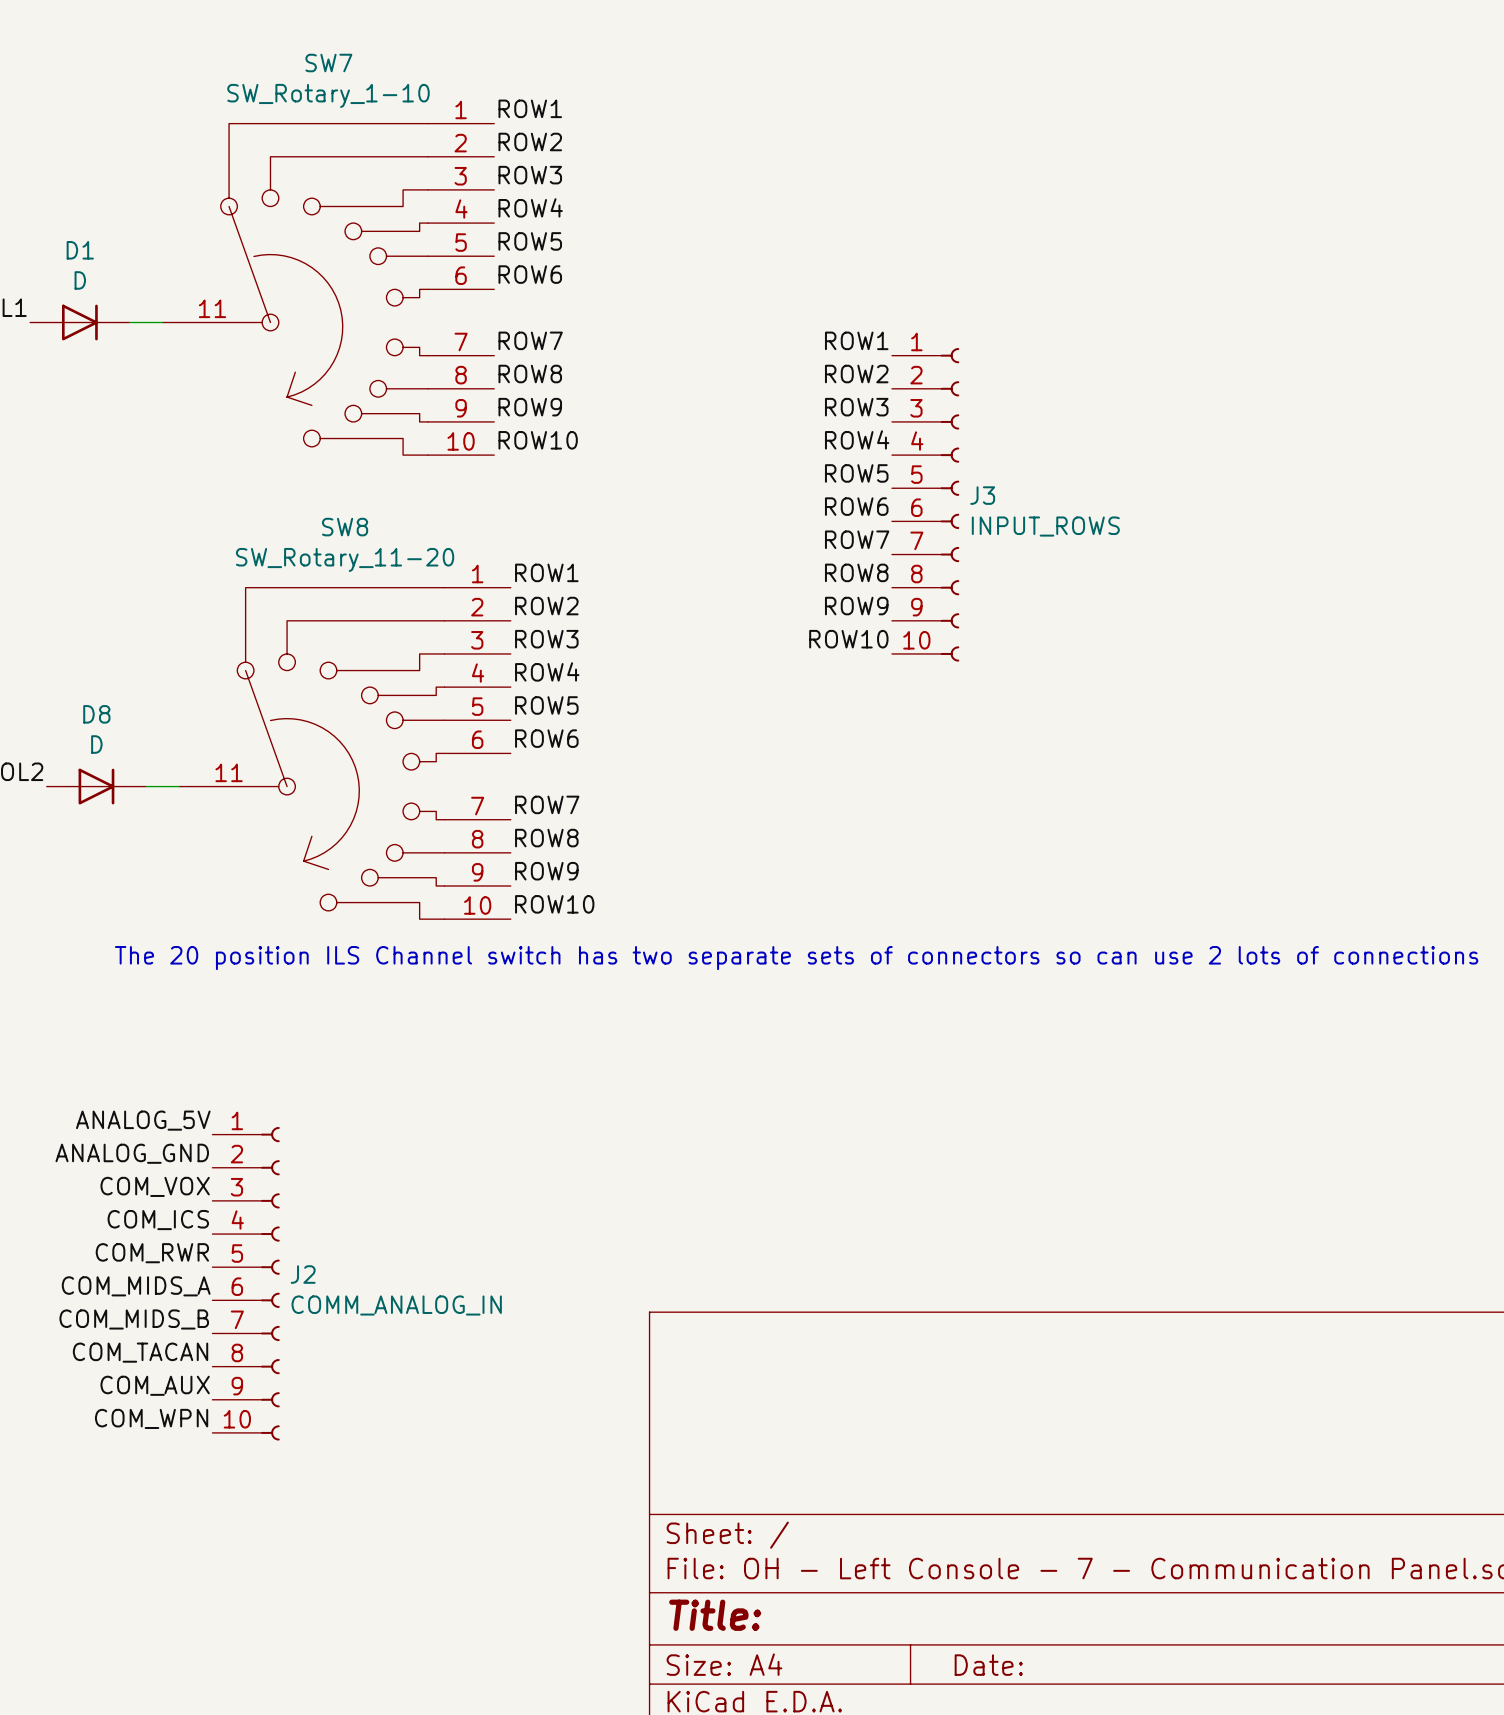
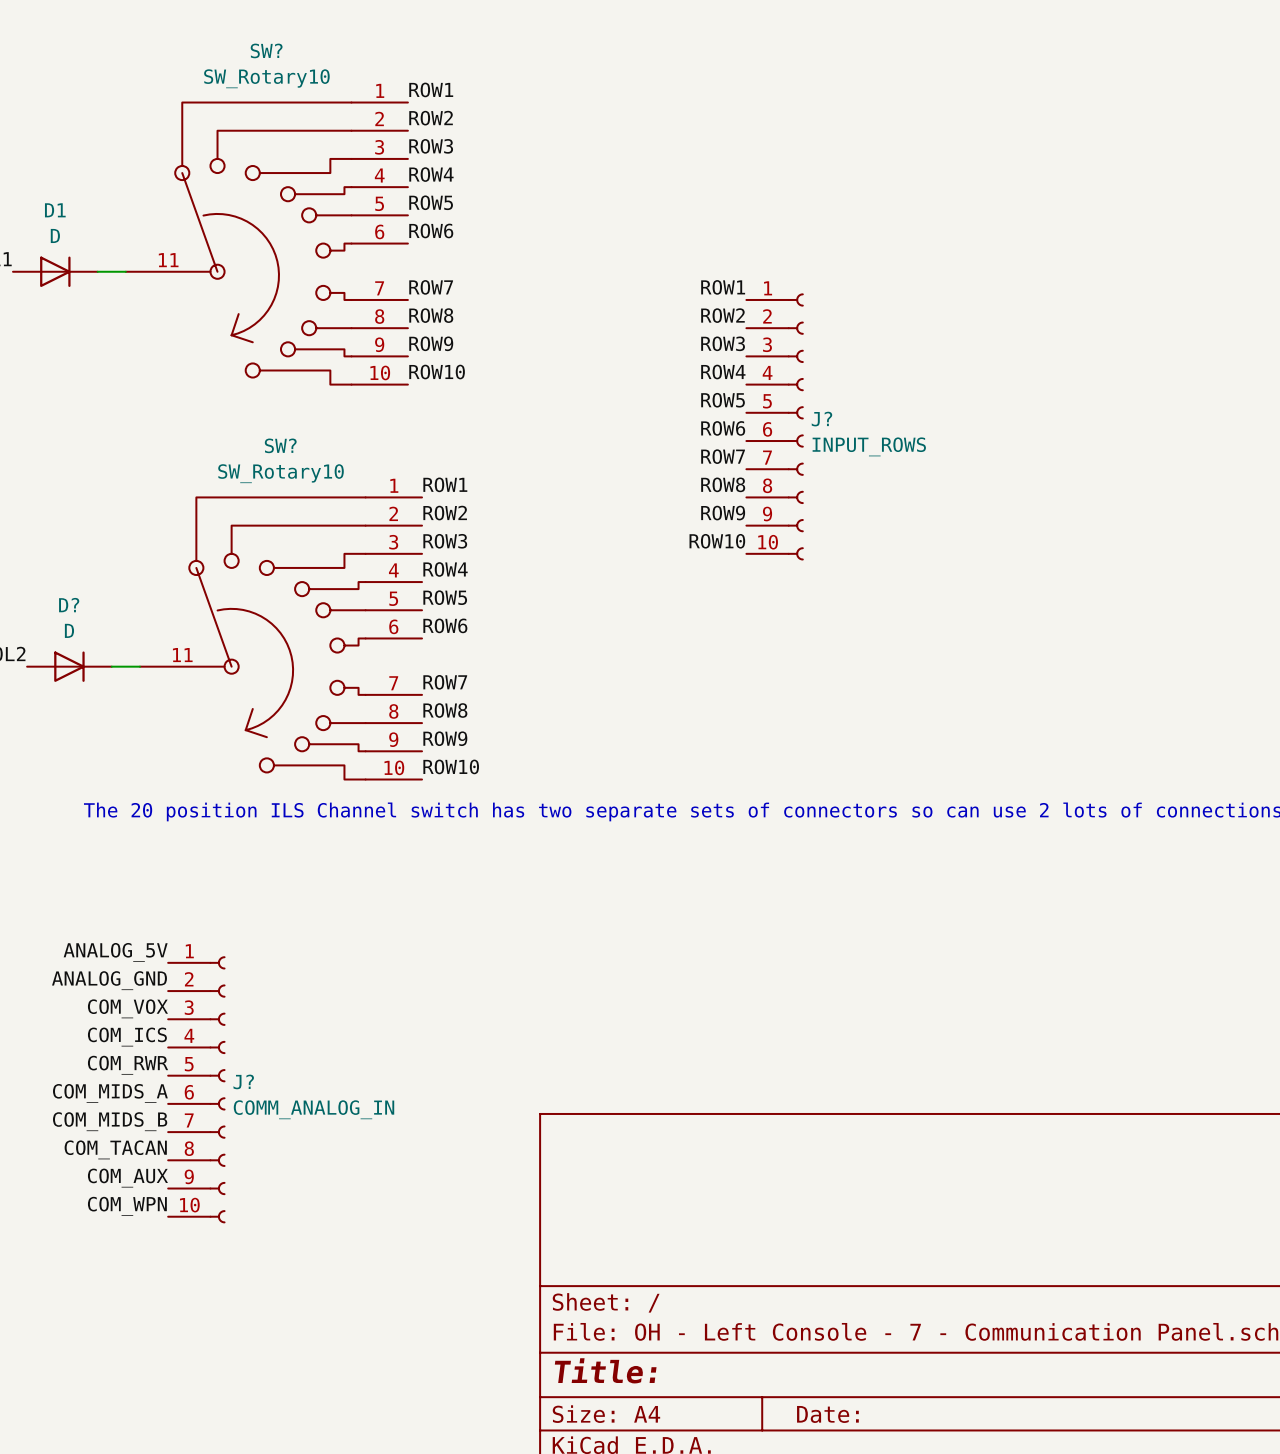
SW7 name: SW7 (328, 63) -> SW? (266, 50)
SW7 value: SW_Rotary_1-10 (328, 95) -> SW_Rotary10 (266, 78)
J3 name: J3 (982, 495) -> J? (821, 419)
SW8 name: SW8 (345, 527) -> SW? (280, 445)
SW8 value: SW_Rotary_11-20 (345, 559) -> SW_Rotary10 (281, 473)
D8 name: D8 (96, 714) -> D? (69, 605)
J2 name: J2 (303, 1274) -> J? (243, 1081)

